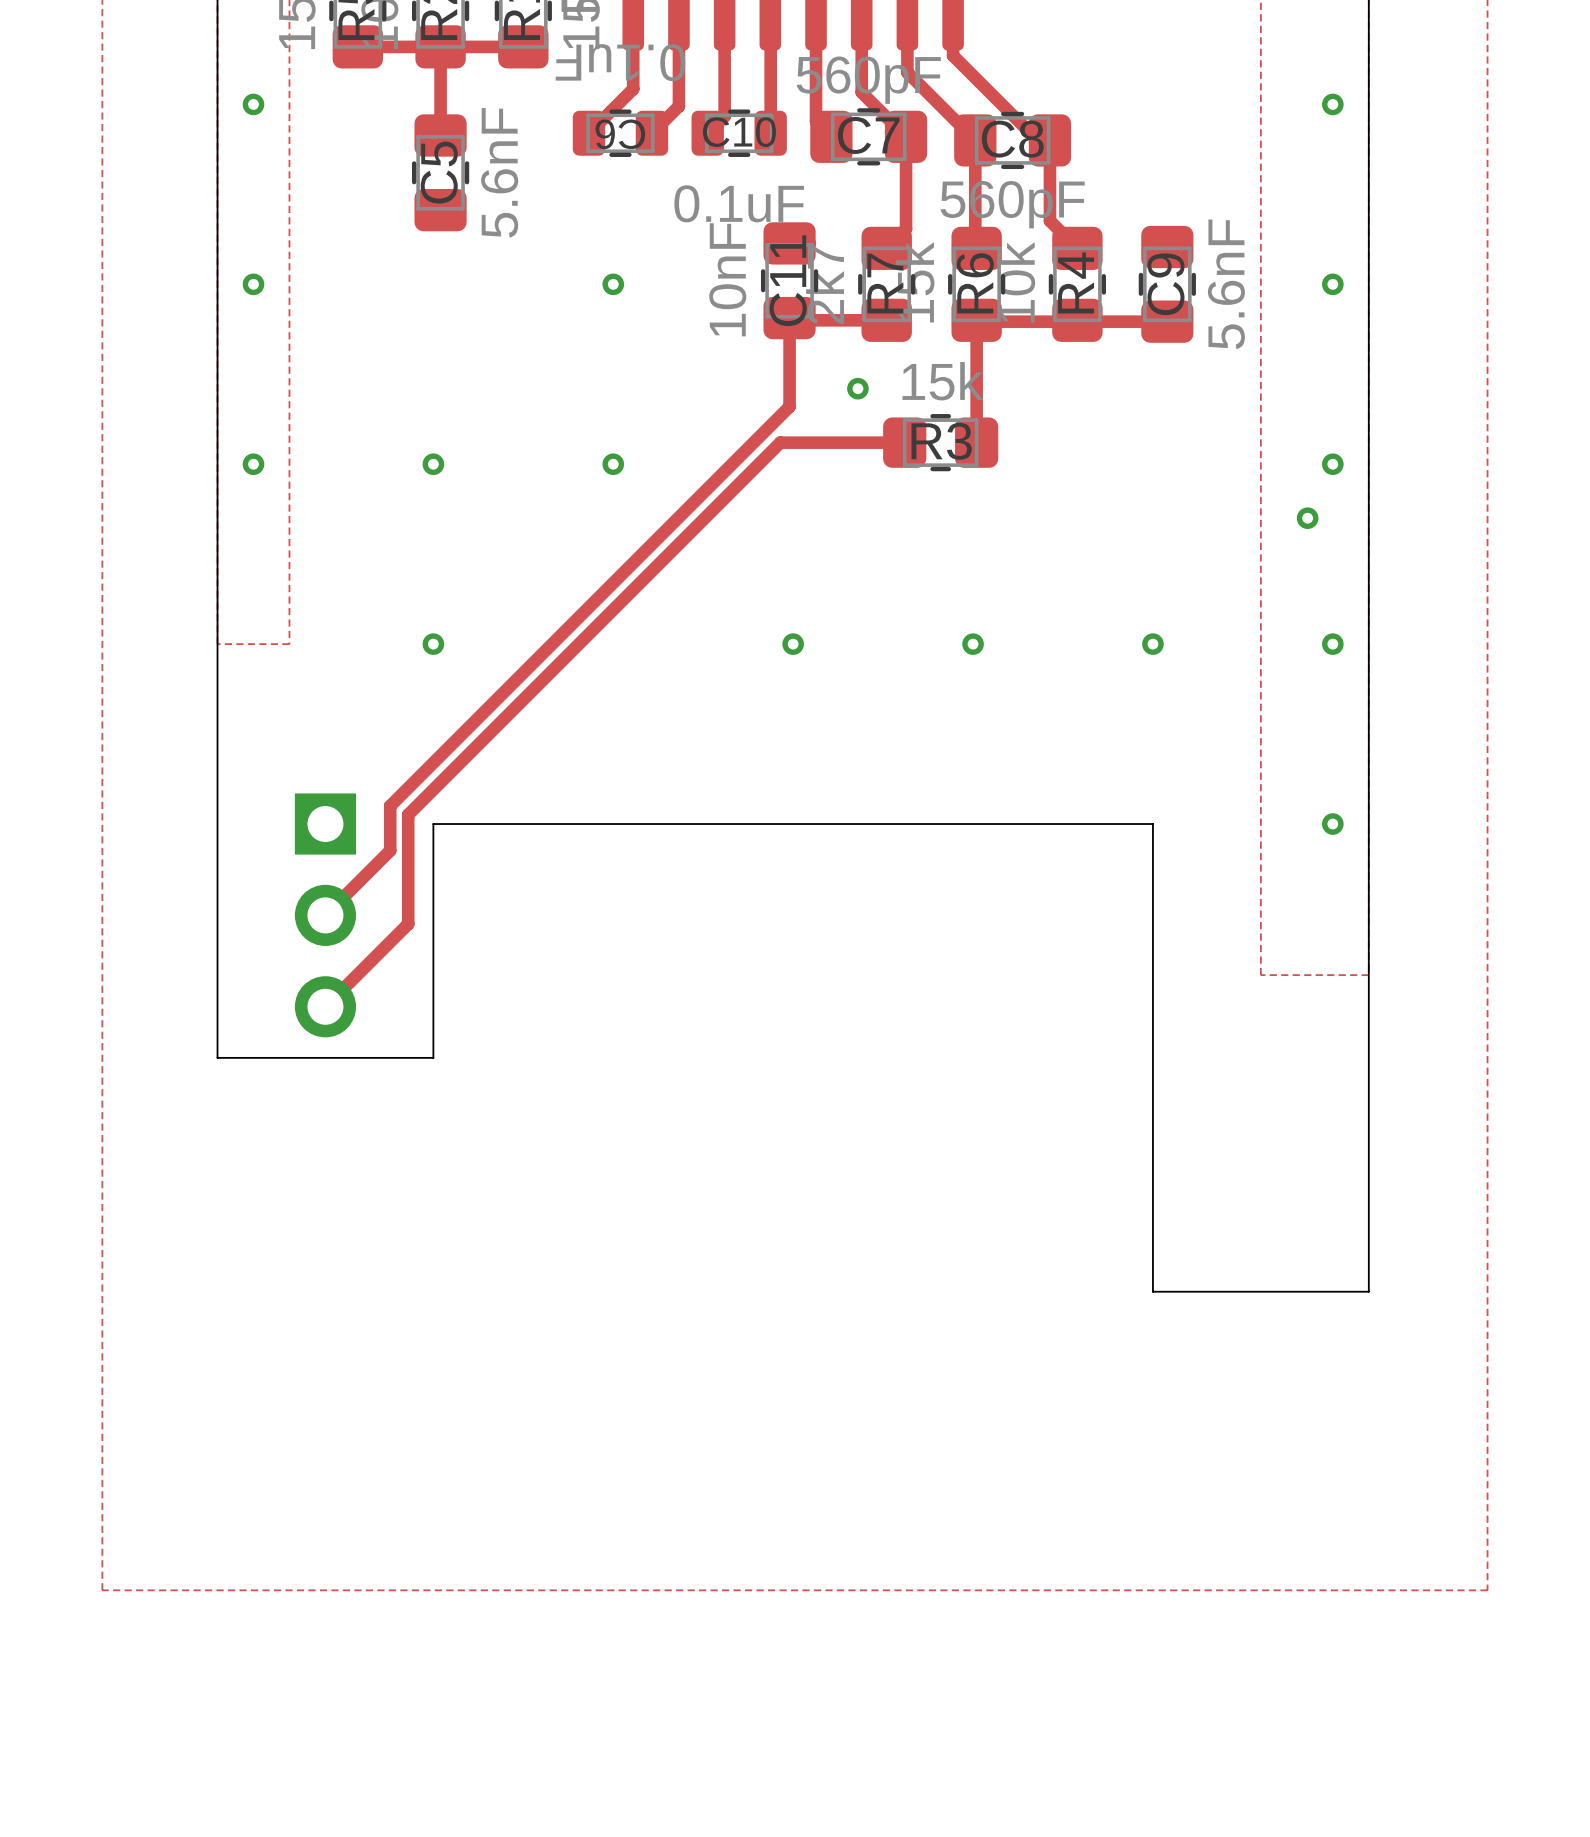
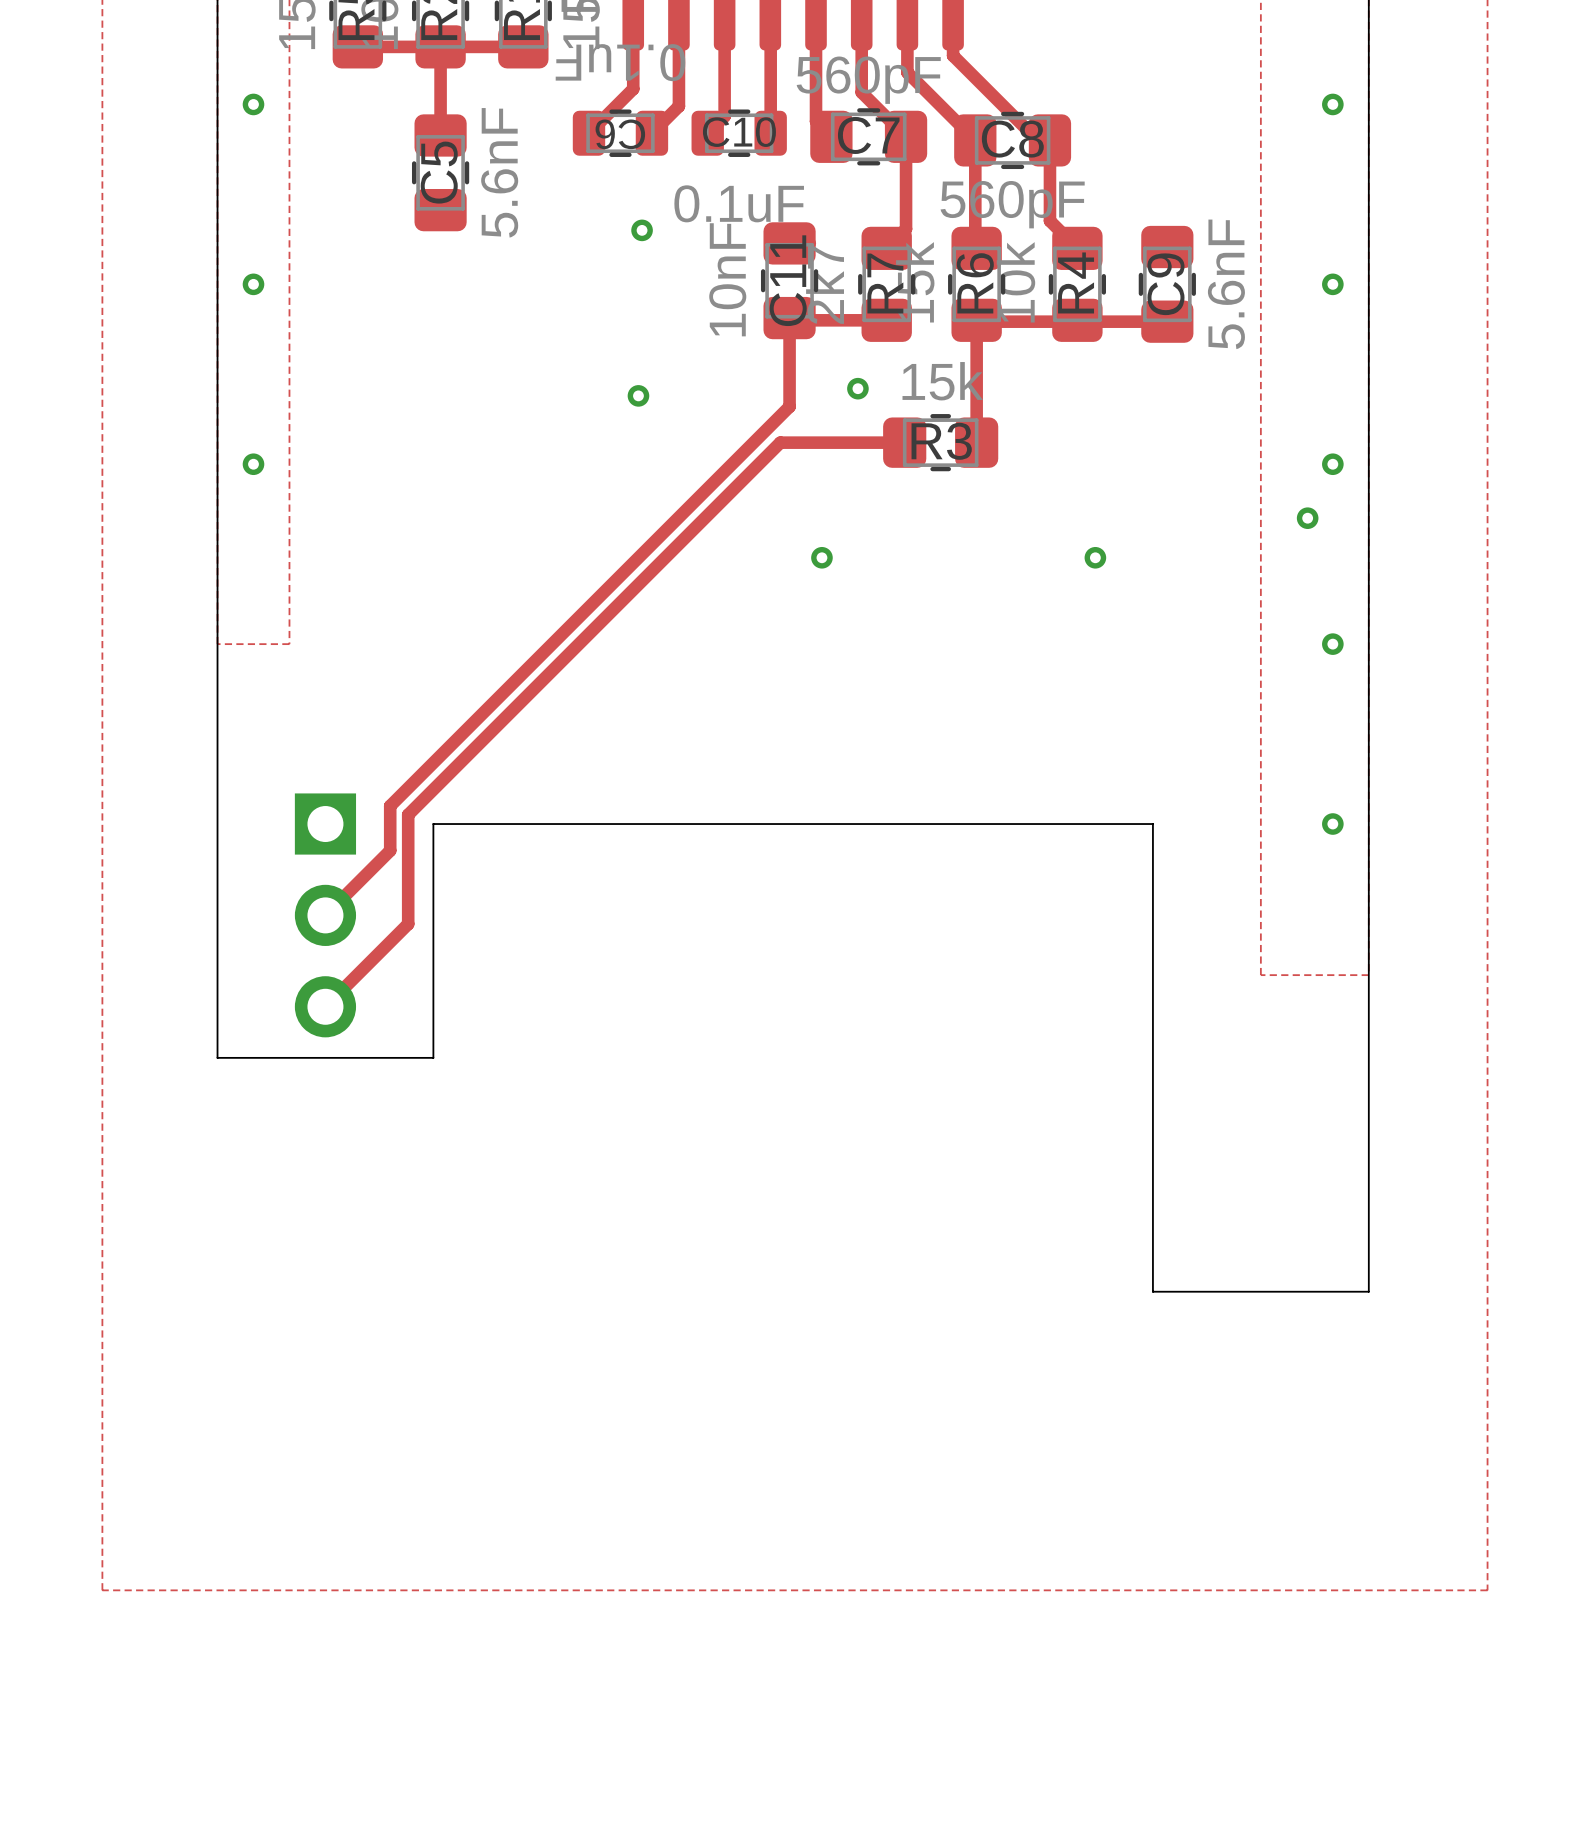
via: none -> (642, 230)
via: (613, 284) -> none
via: none -> (638, 395)
via: (433, 464) -> none
via: (613, 464) -> none
via: none -> (821, 557)
via: none -> (1095, 557)
via: (433, 644) -> none
via: (793, 644) -> none
via: (973, 644) -> none
via: (1152, 644) -> none

